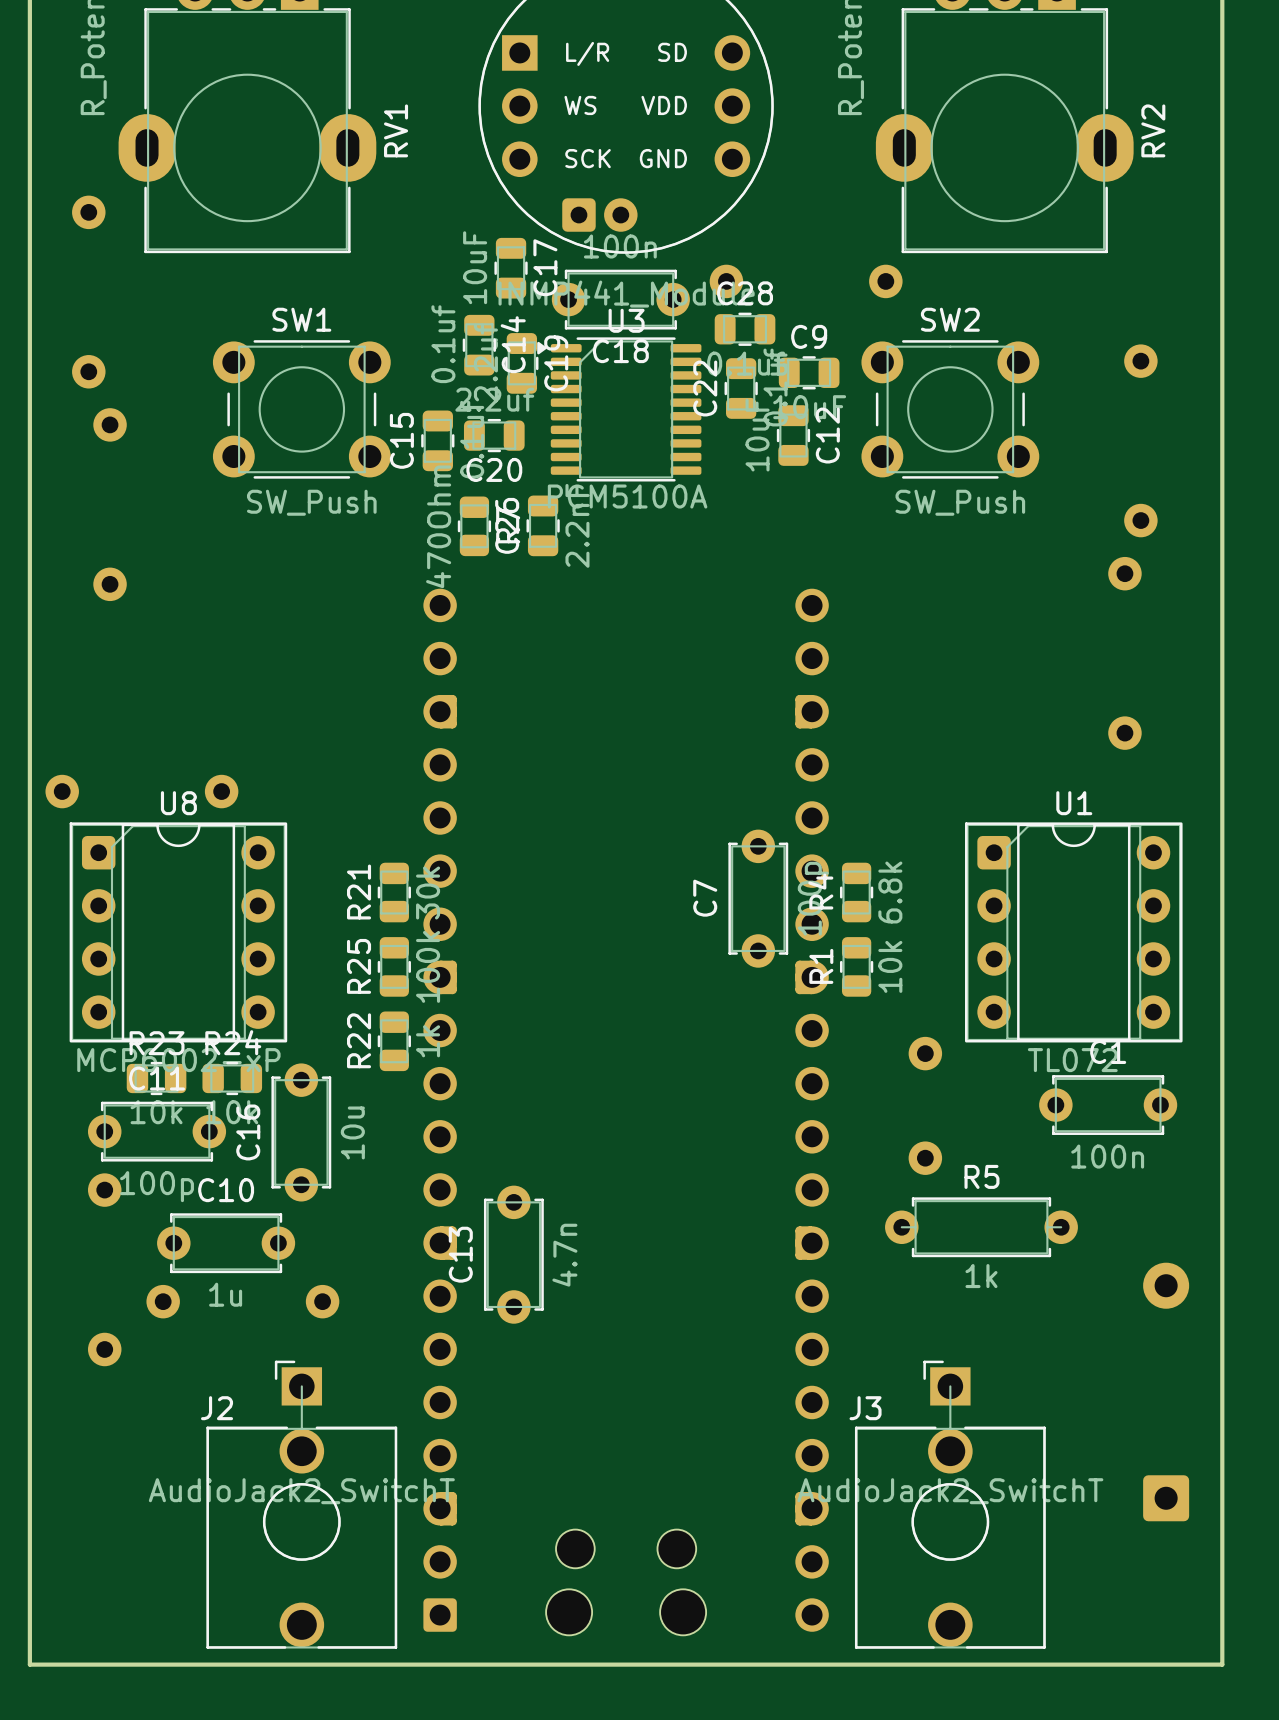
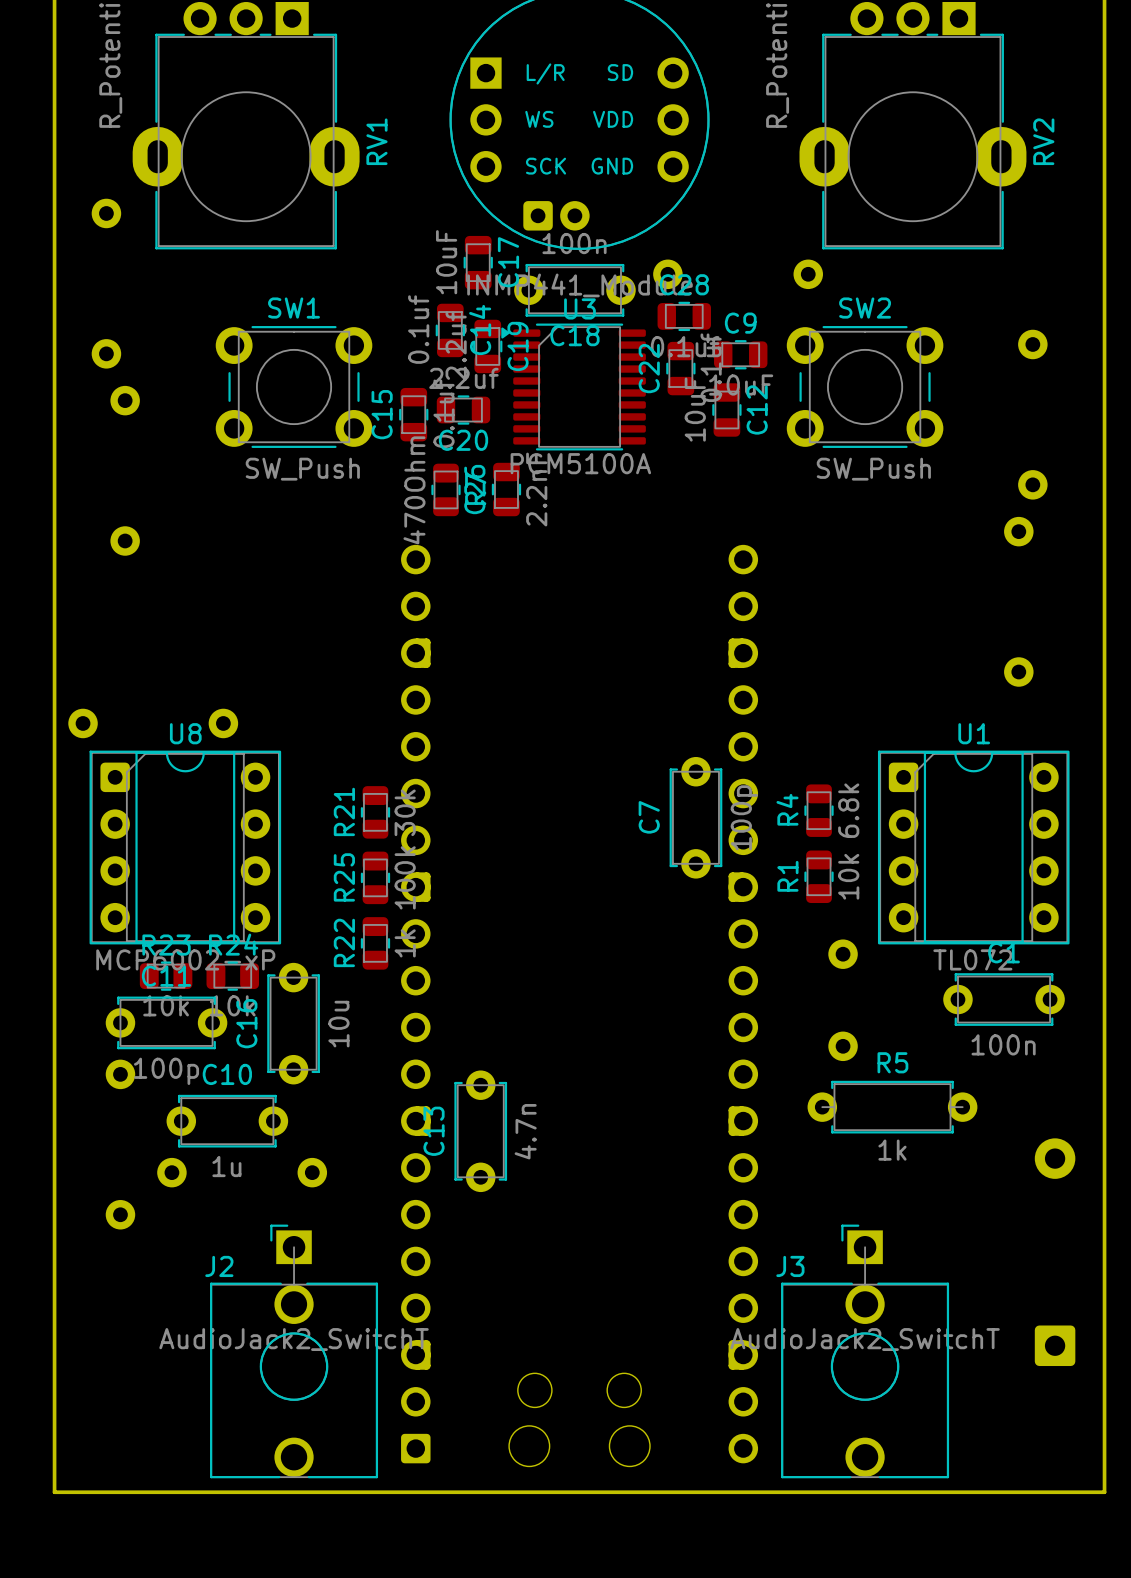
R4 position: (856, 892) -> (819, 810)
R1 position: (856, 966) -> (819, 876)

